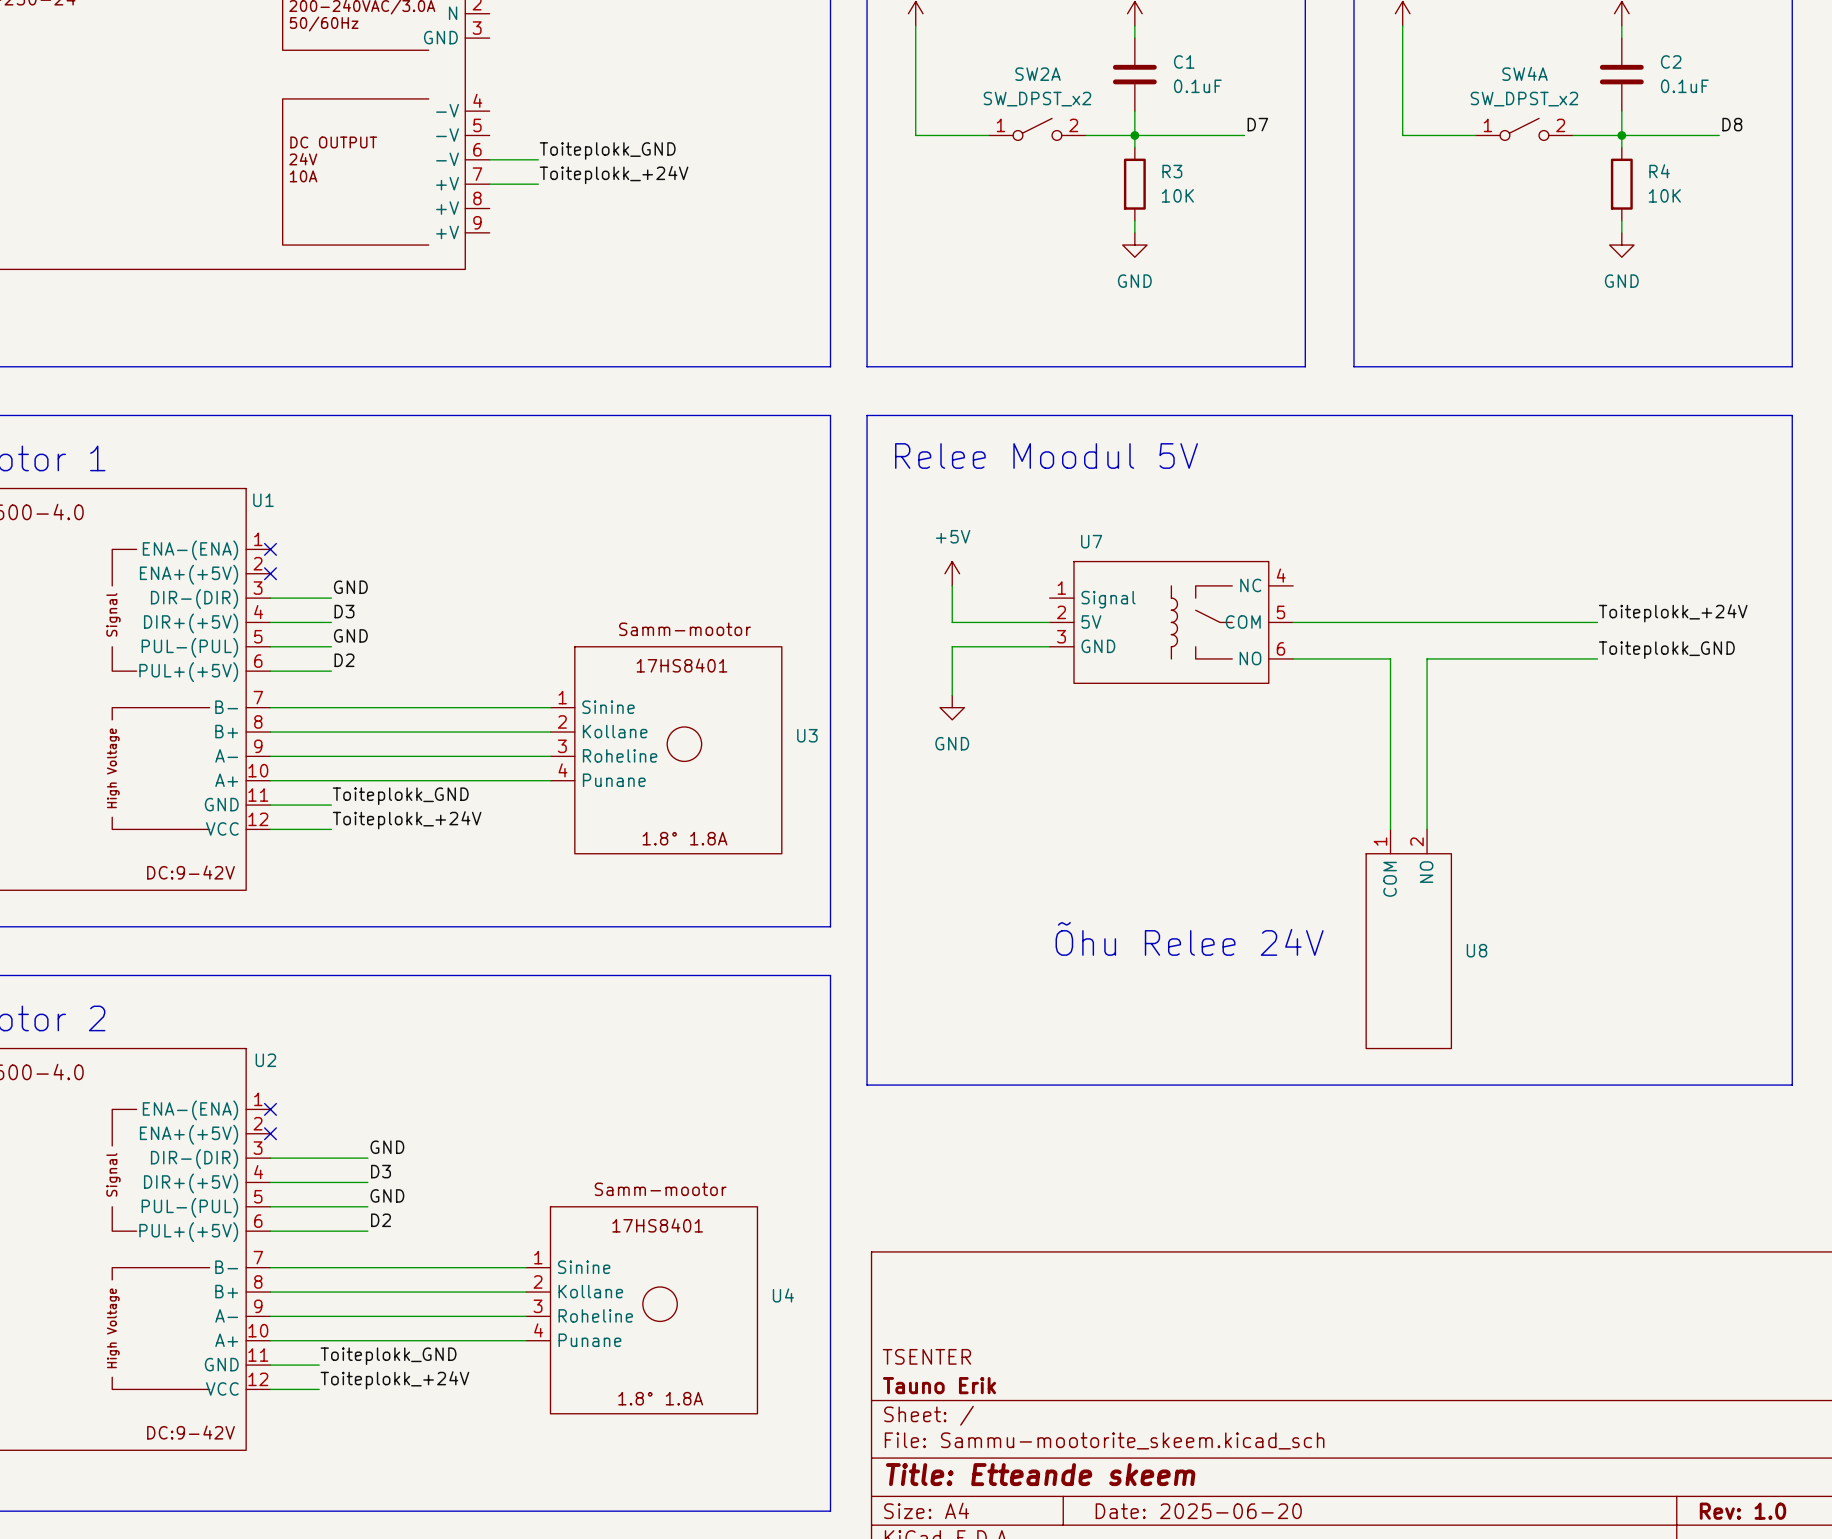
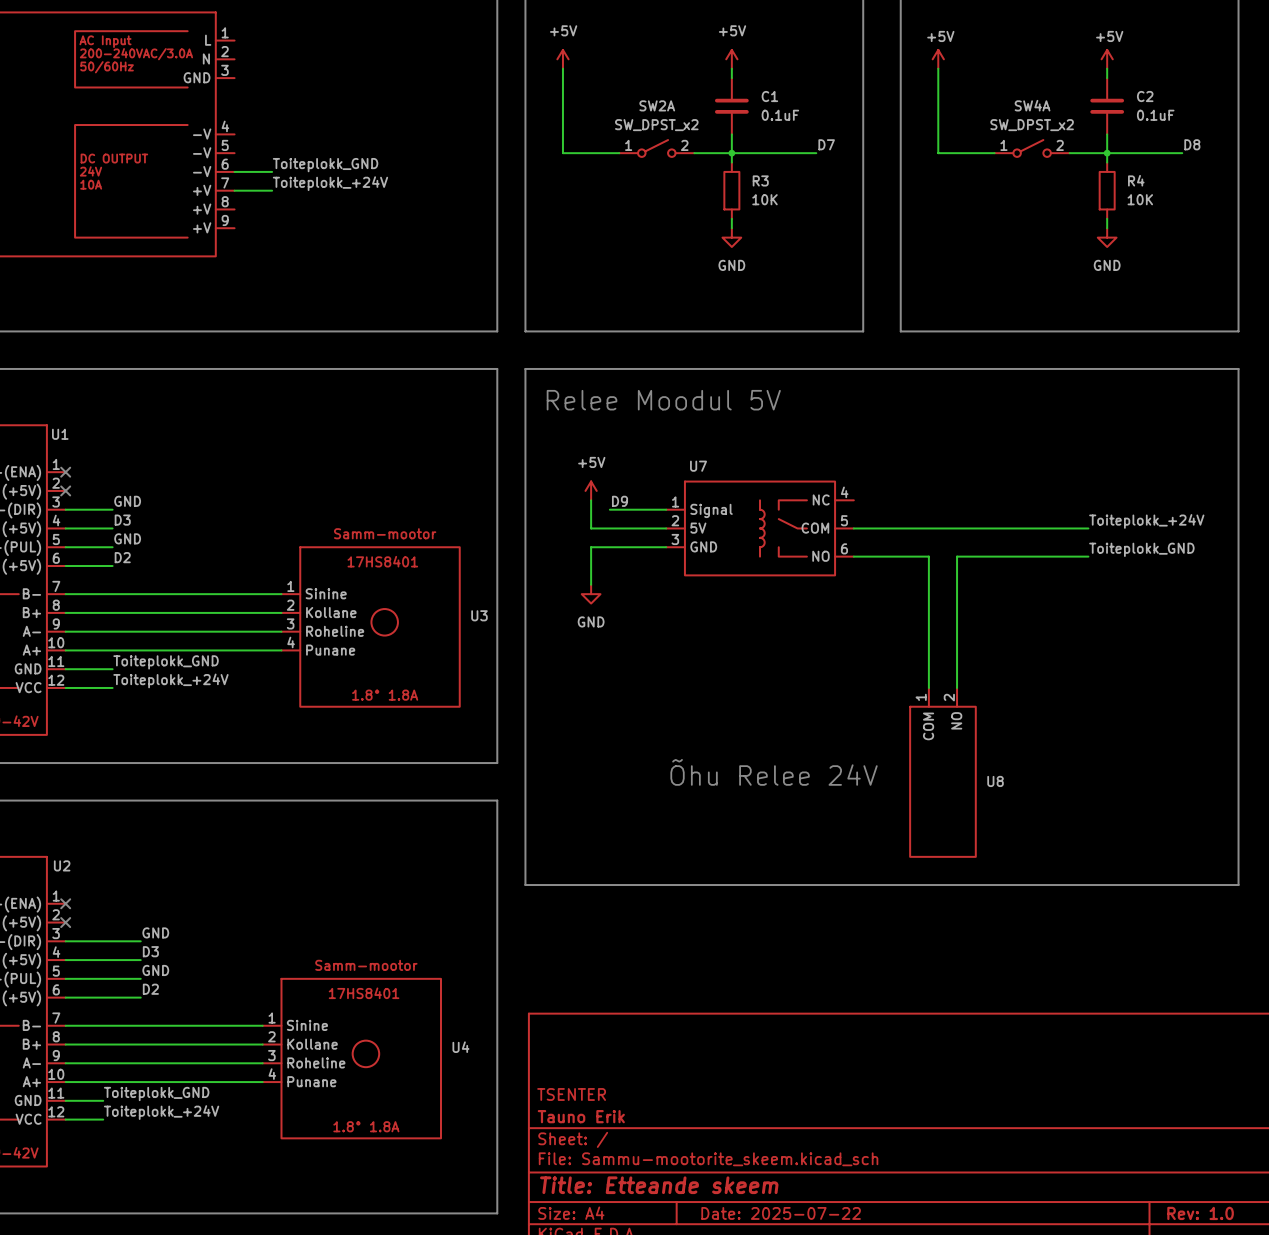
label: none -> D9 (620, 501)
wire: none -> (609, 509) (666, 509)
title block: Date: 2025-06-20 (1198, 1511) -> Date: 2025-07-22 (781, 1213)

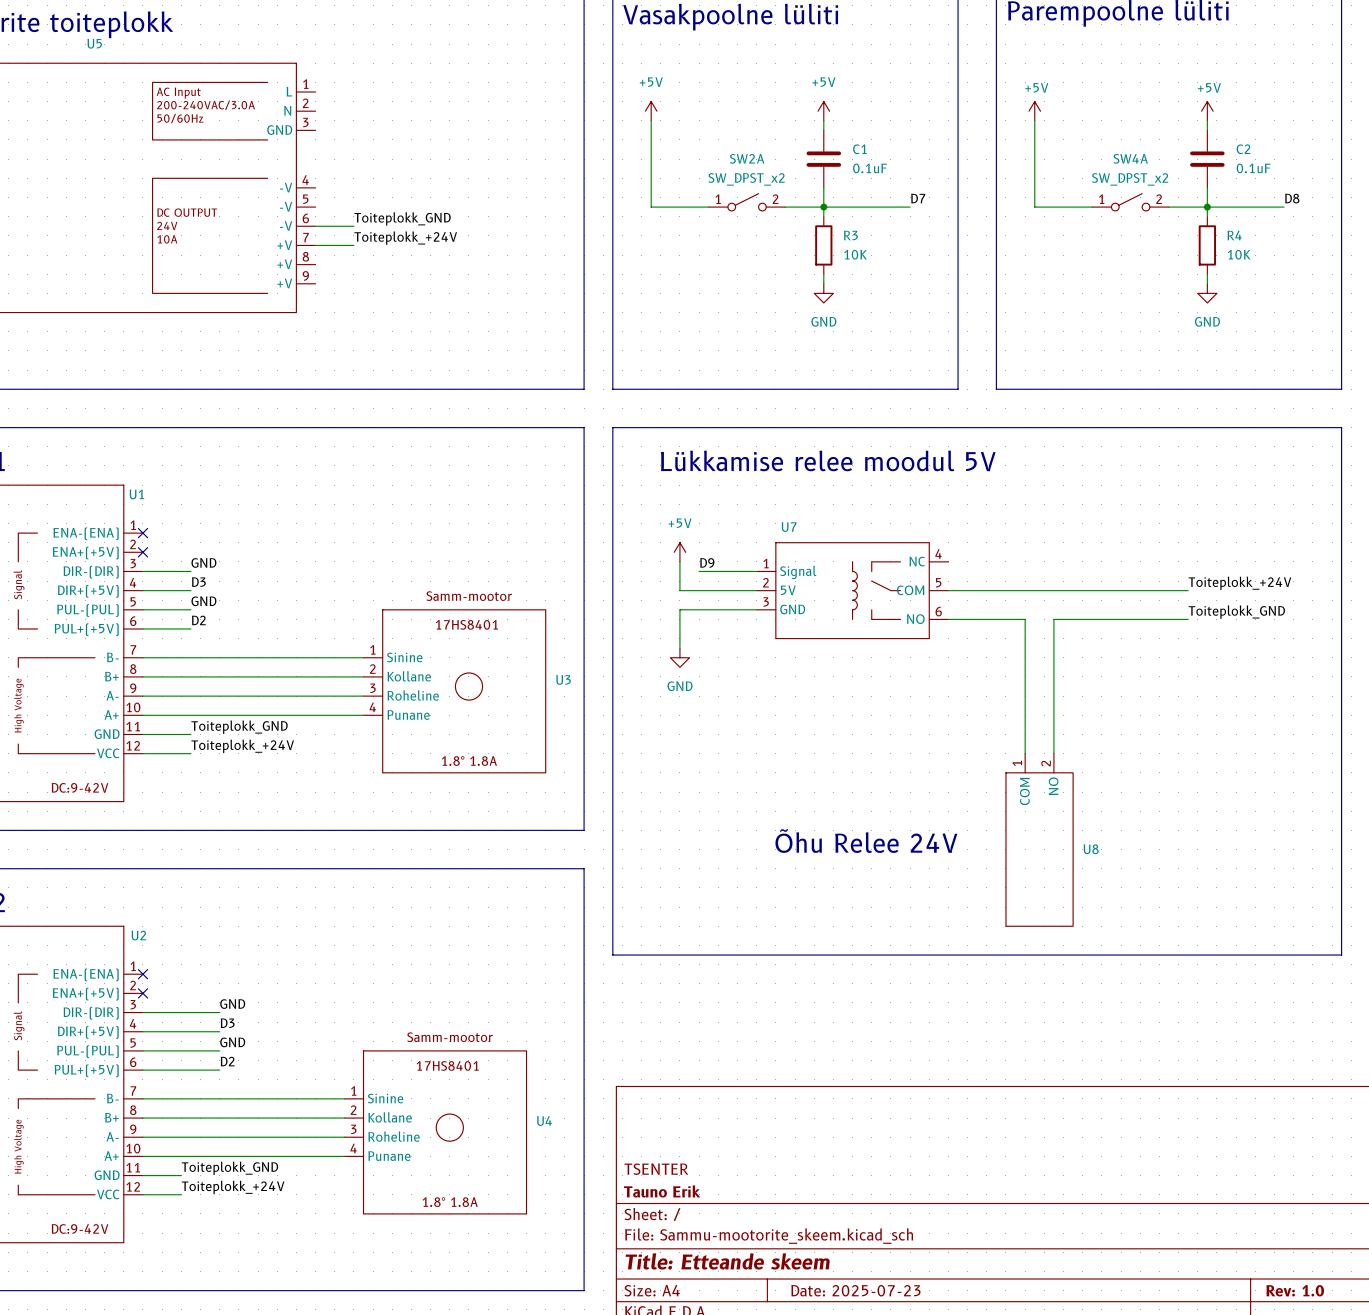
text: Relee Moodul 5V (663, 400) -> Lükkamise relee moodul 5V (828, 460)
title block: Date: 2025-07-22 (781, 1213) -> Date: 2025-07-23 (855, 1290)

